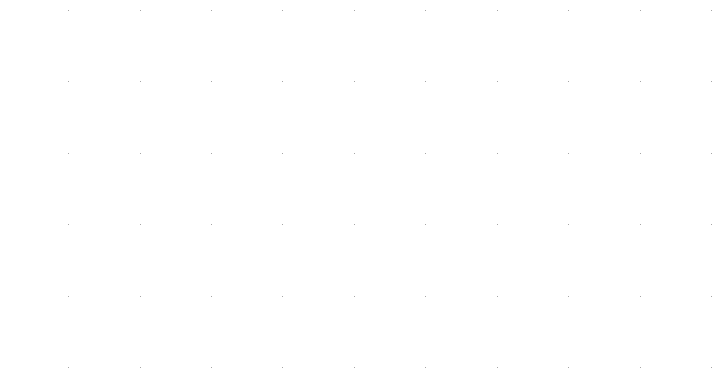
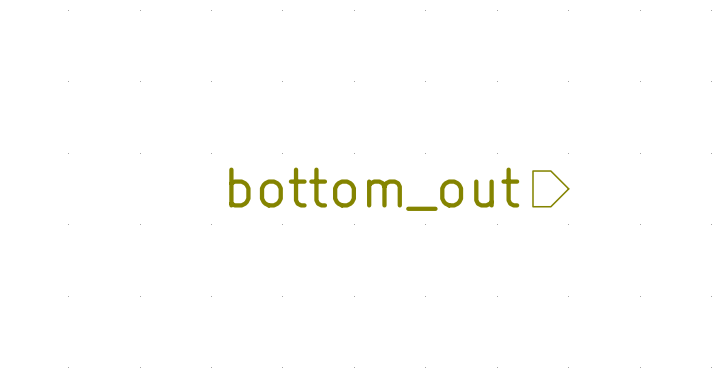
hierarchical label: none -> bottom_out (374, 189)

